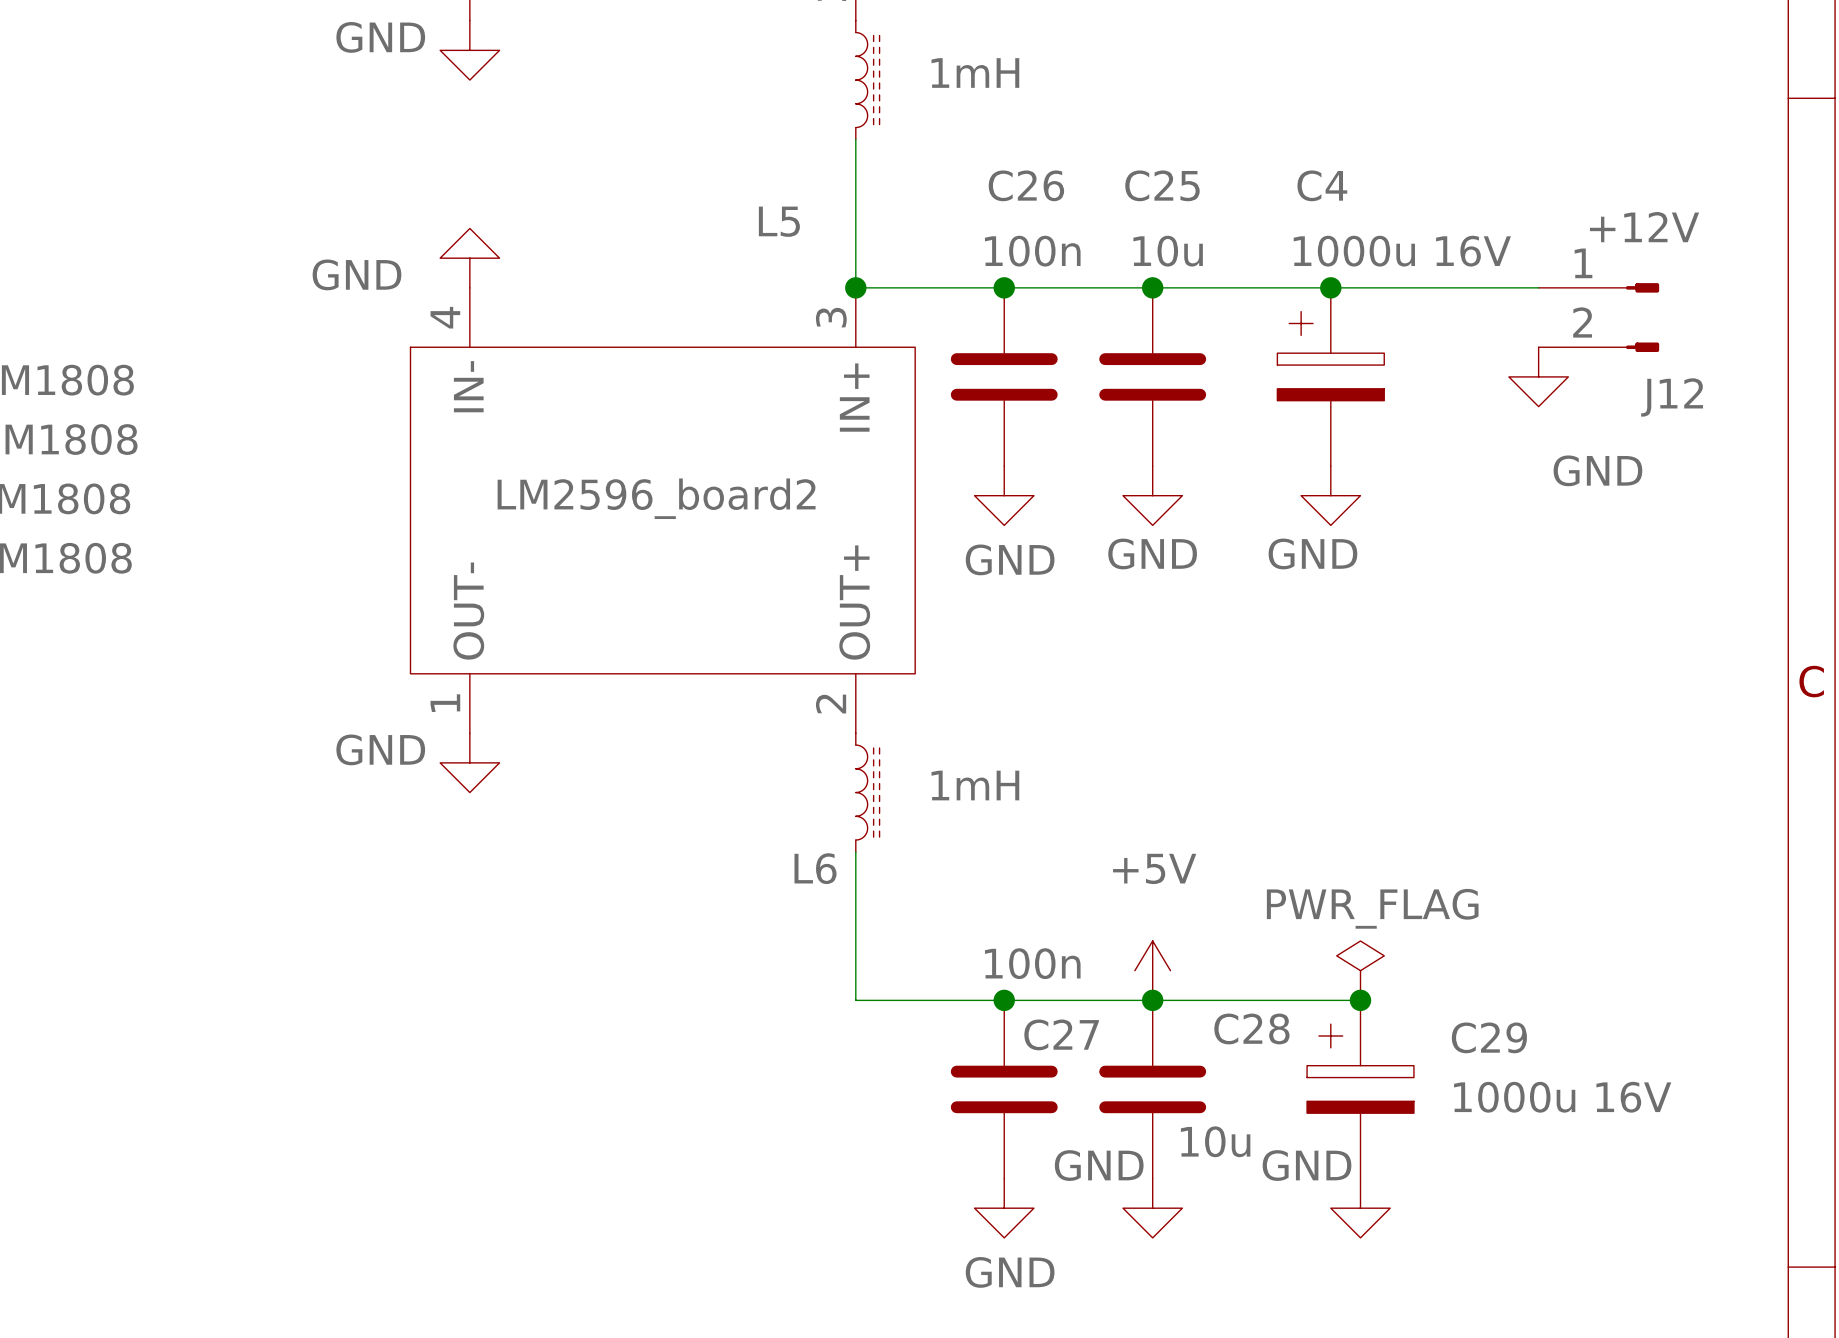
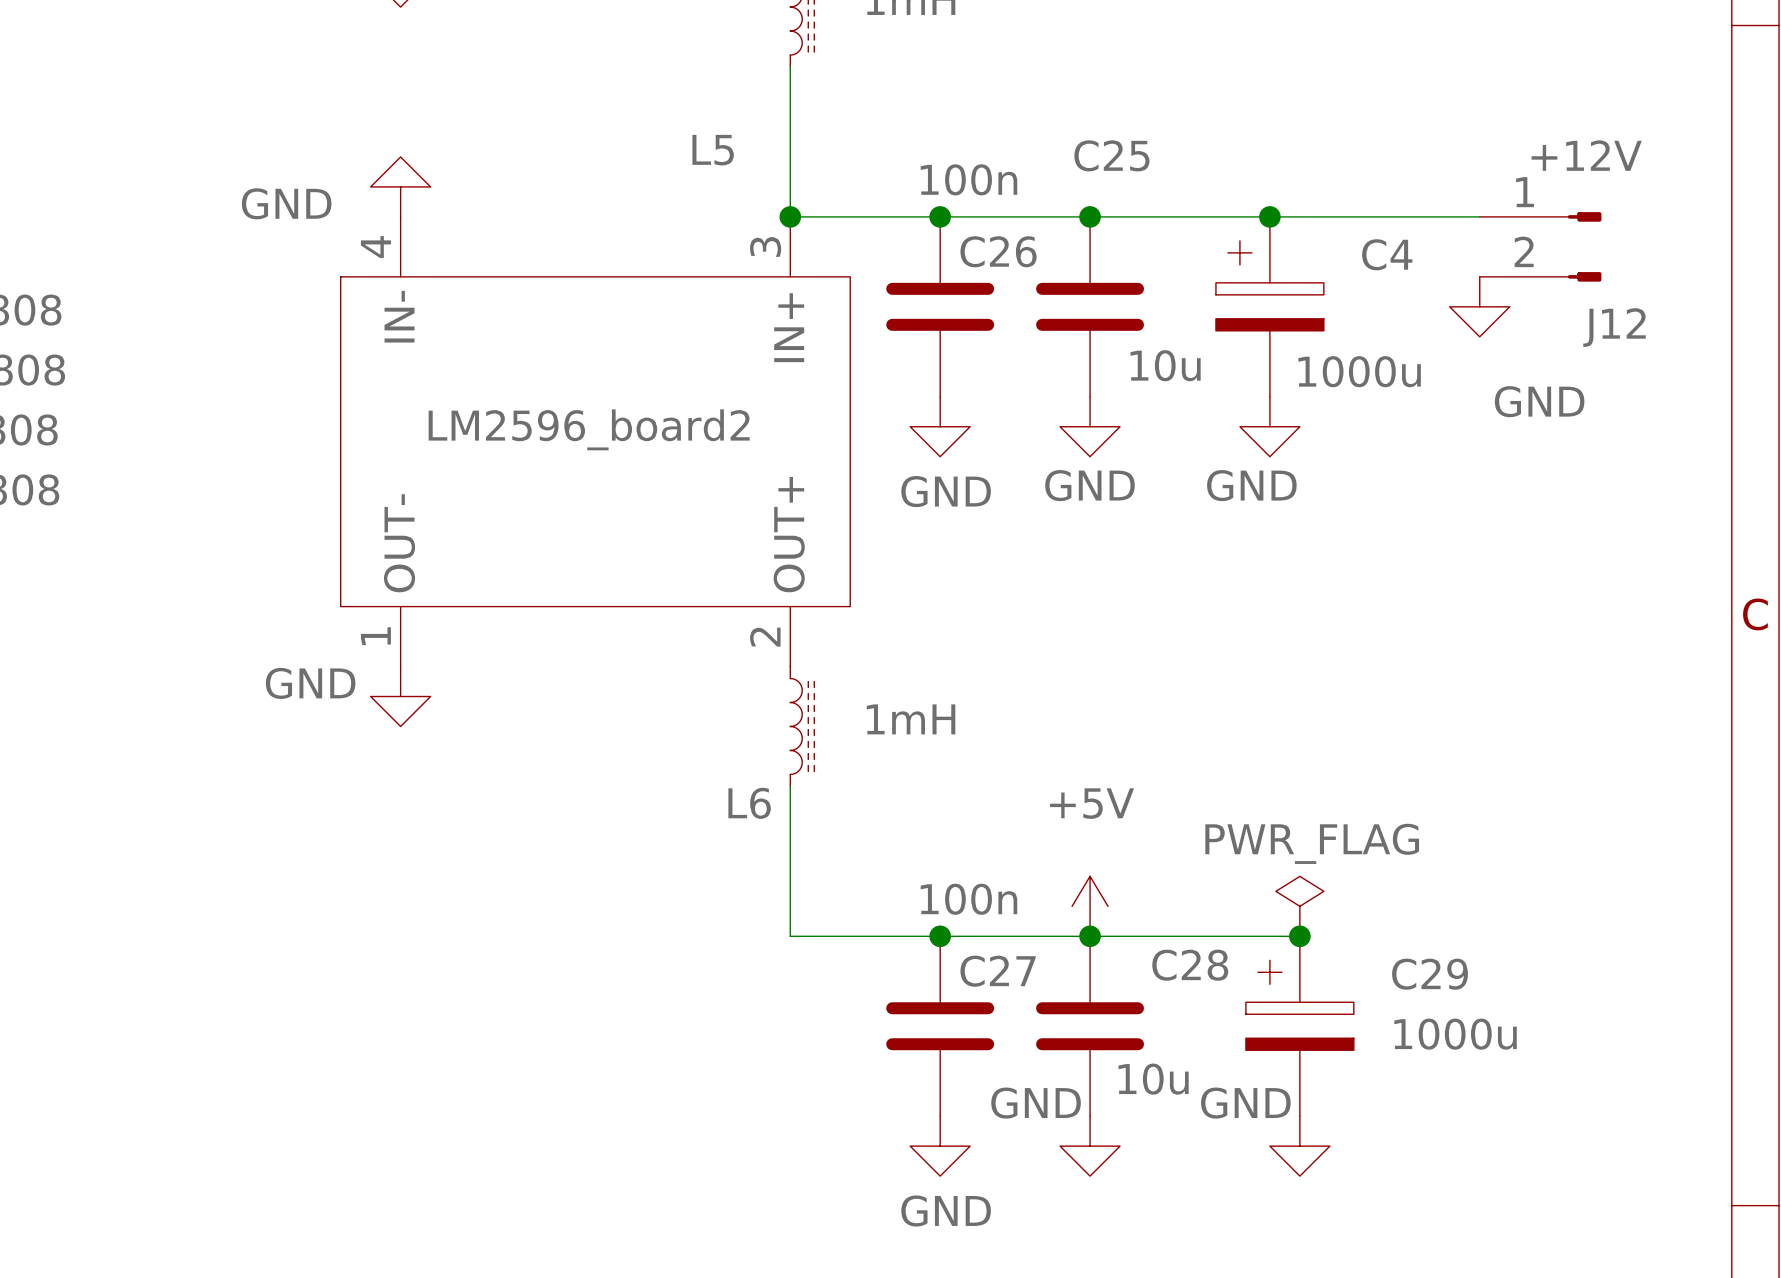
C26 name position: C26 (1026, 185) -> C26 (998, 251)
C25 name position: C25 (1162, 185) -> C25 (1111, 155)
C4 name position: C4 (1322, 185) -> C4 (1387, 254)
C25 value position: 10u (1168, 251) -> 10u (1165, 365)
C4 value: 1000u 16V (1402, 251) -> 1000u (1359, 371)
C29 value: 1000u 16V (1562, 1097) -> 1000u (1455, 1034)

